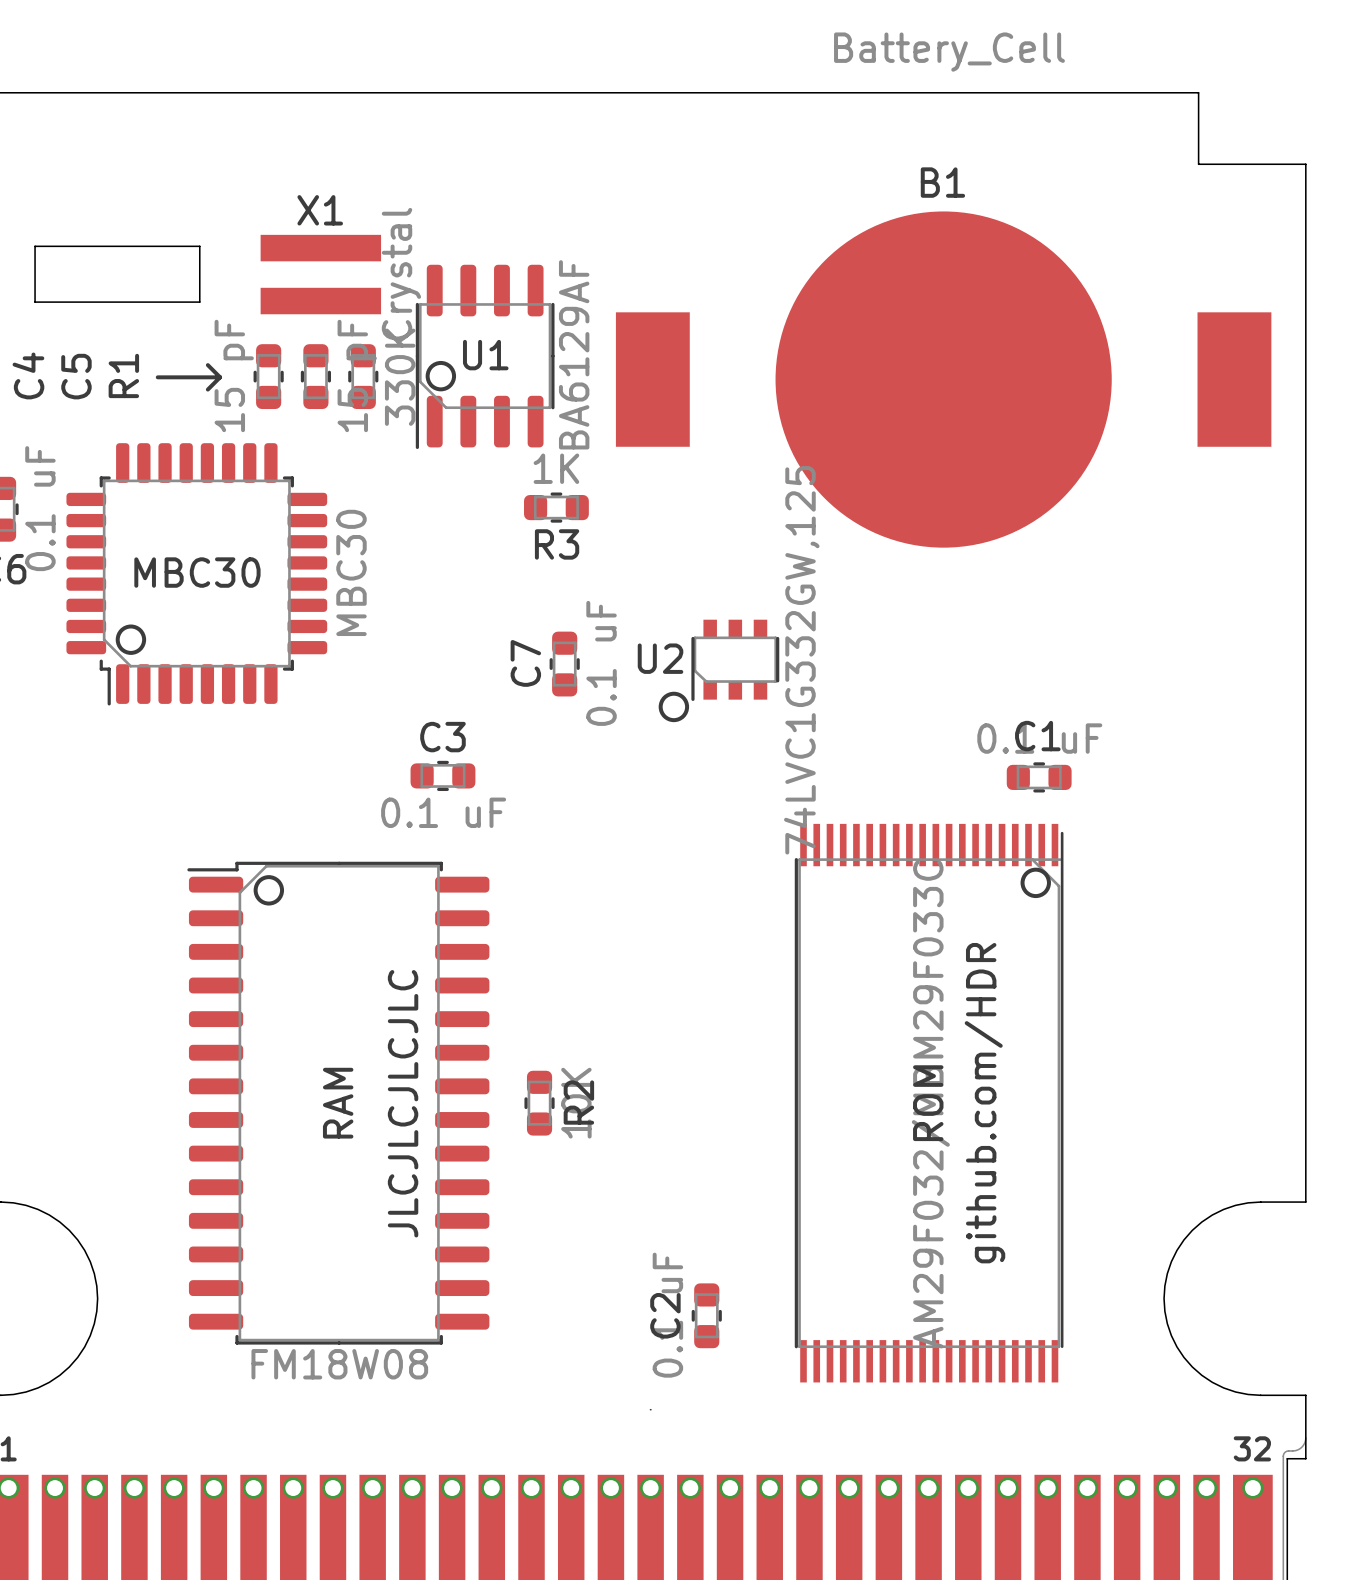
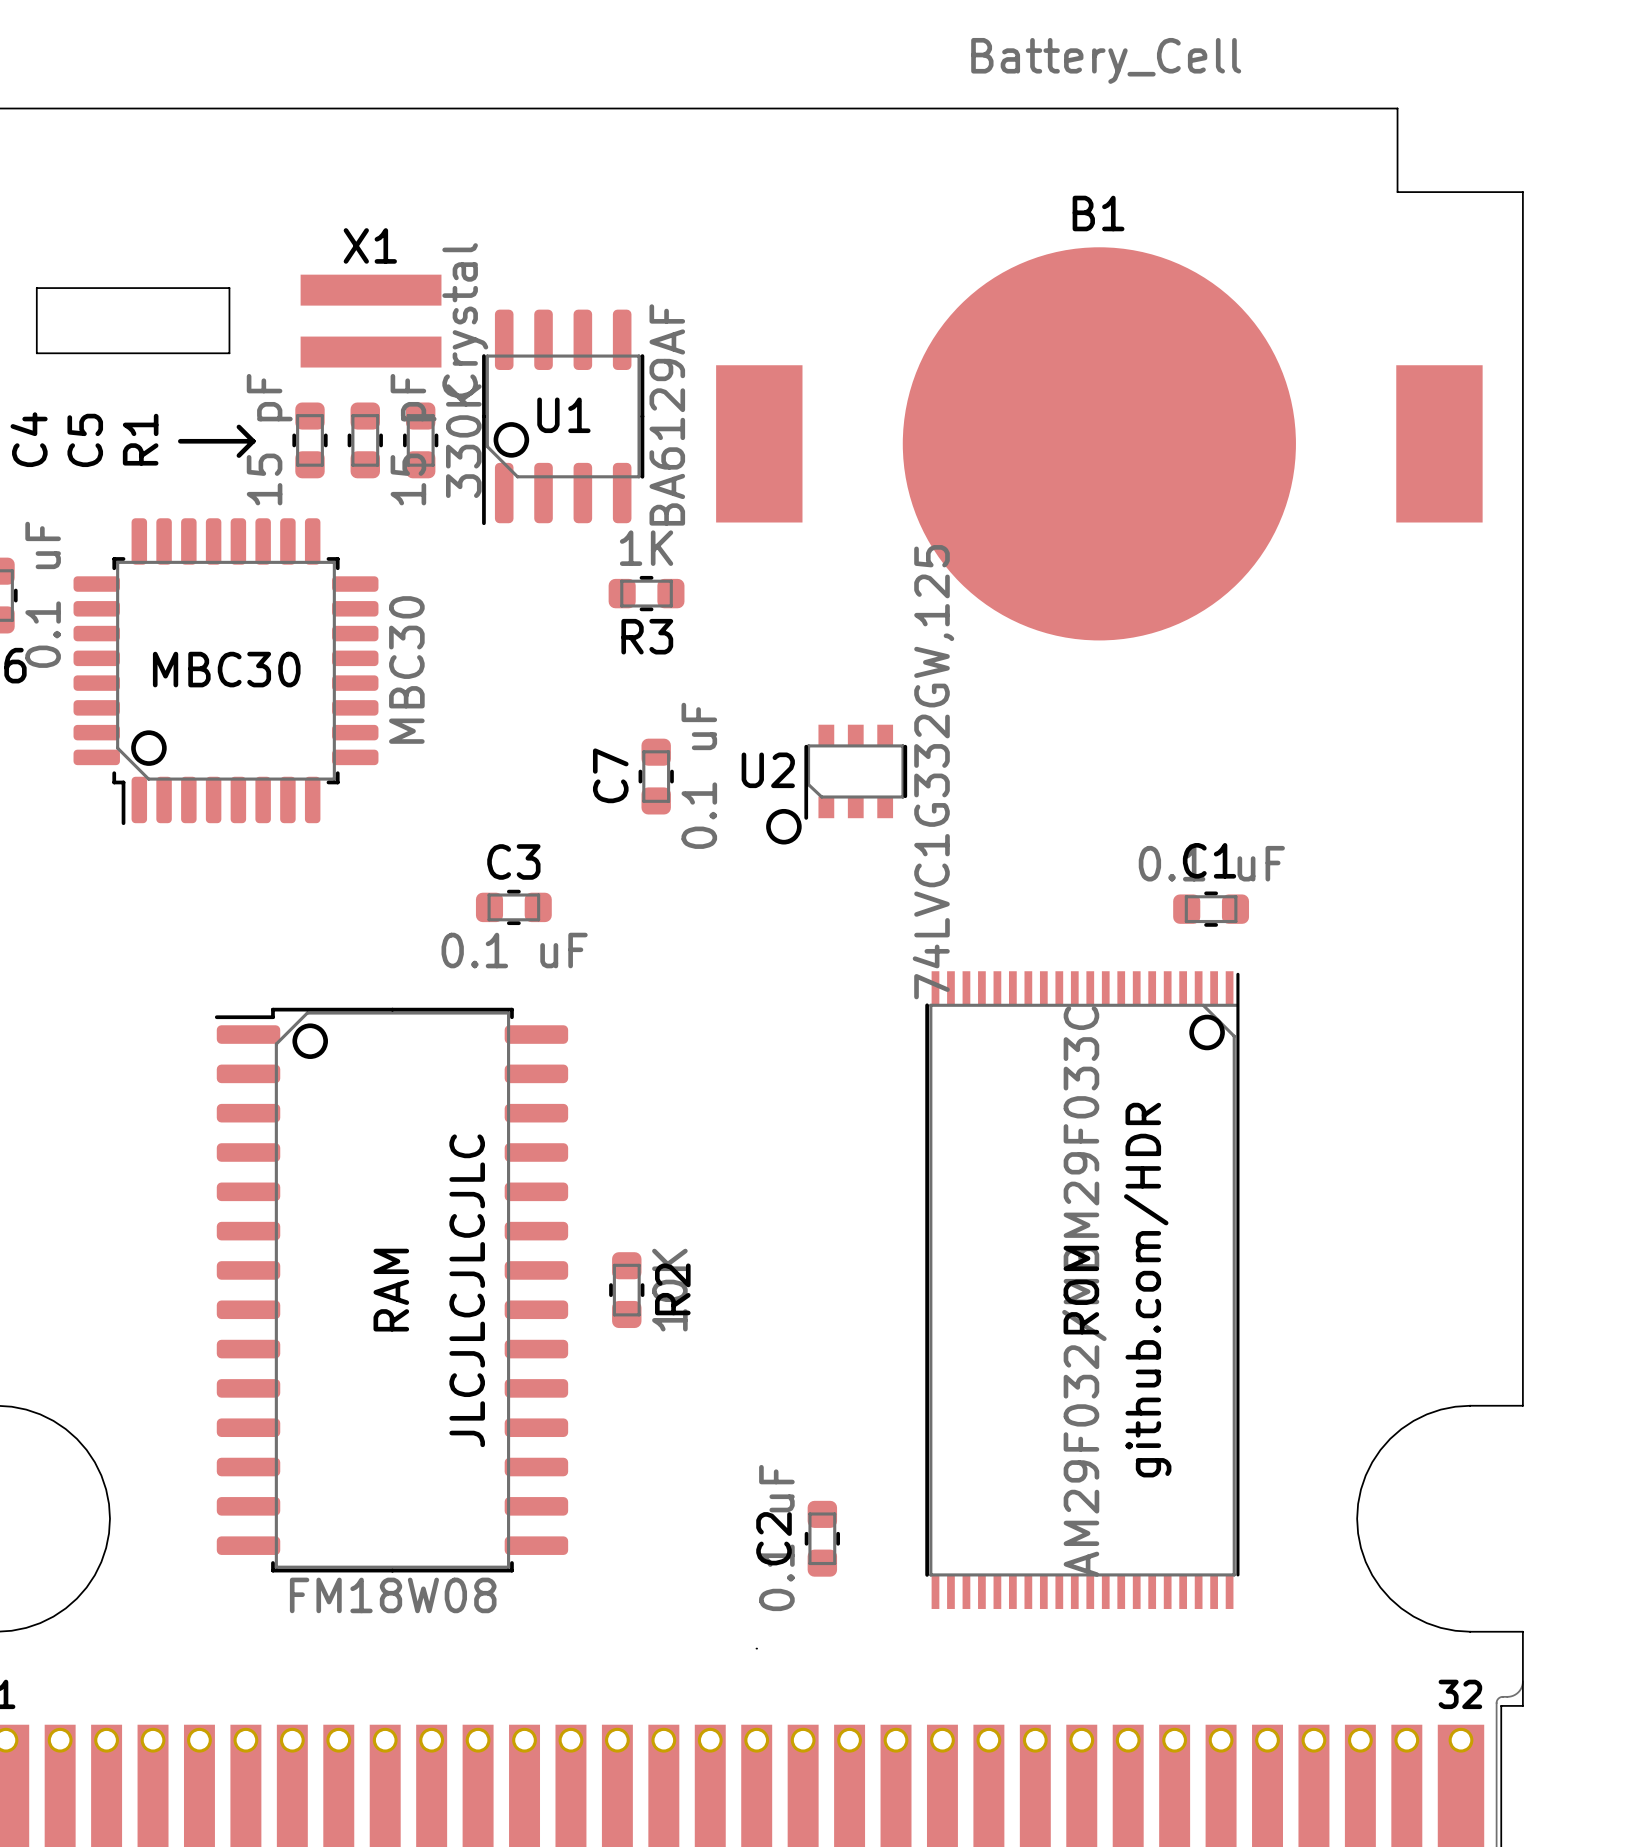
ROM footprint: [794, 823, 1064, 1383] -> [925, 971, 1240, 1609]

